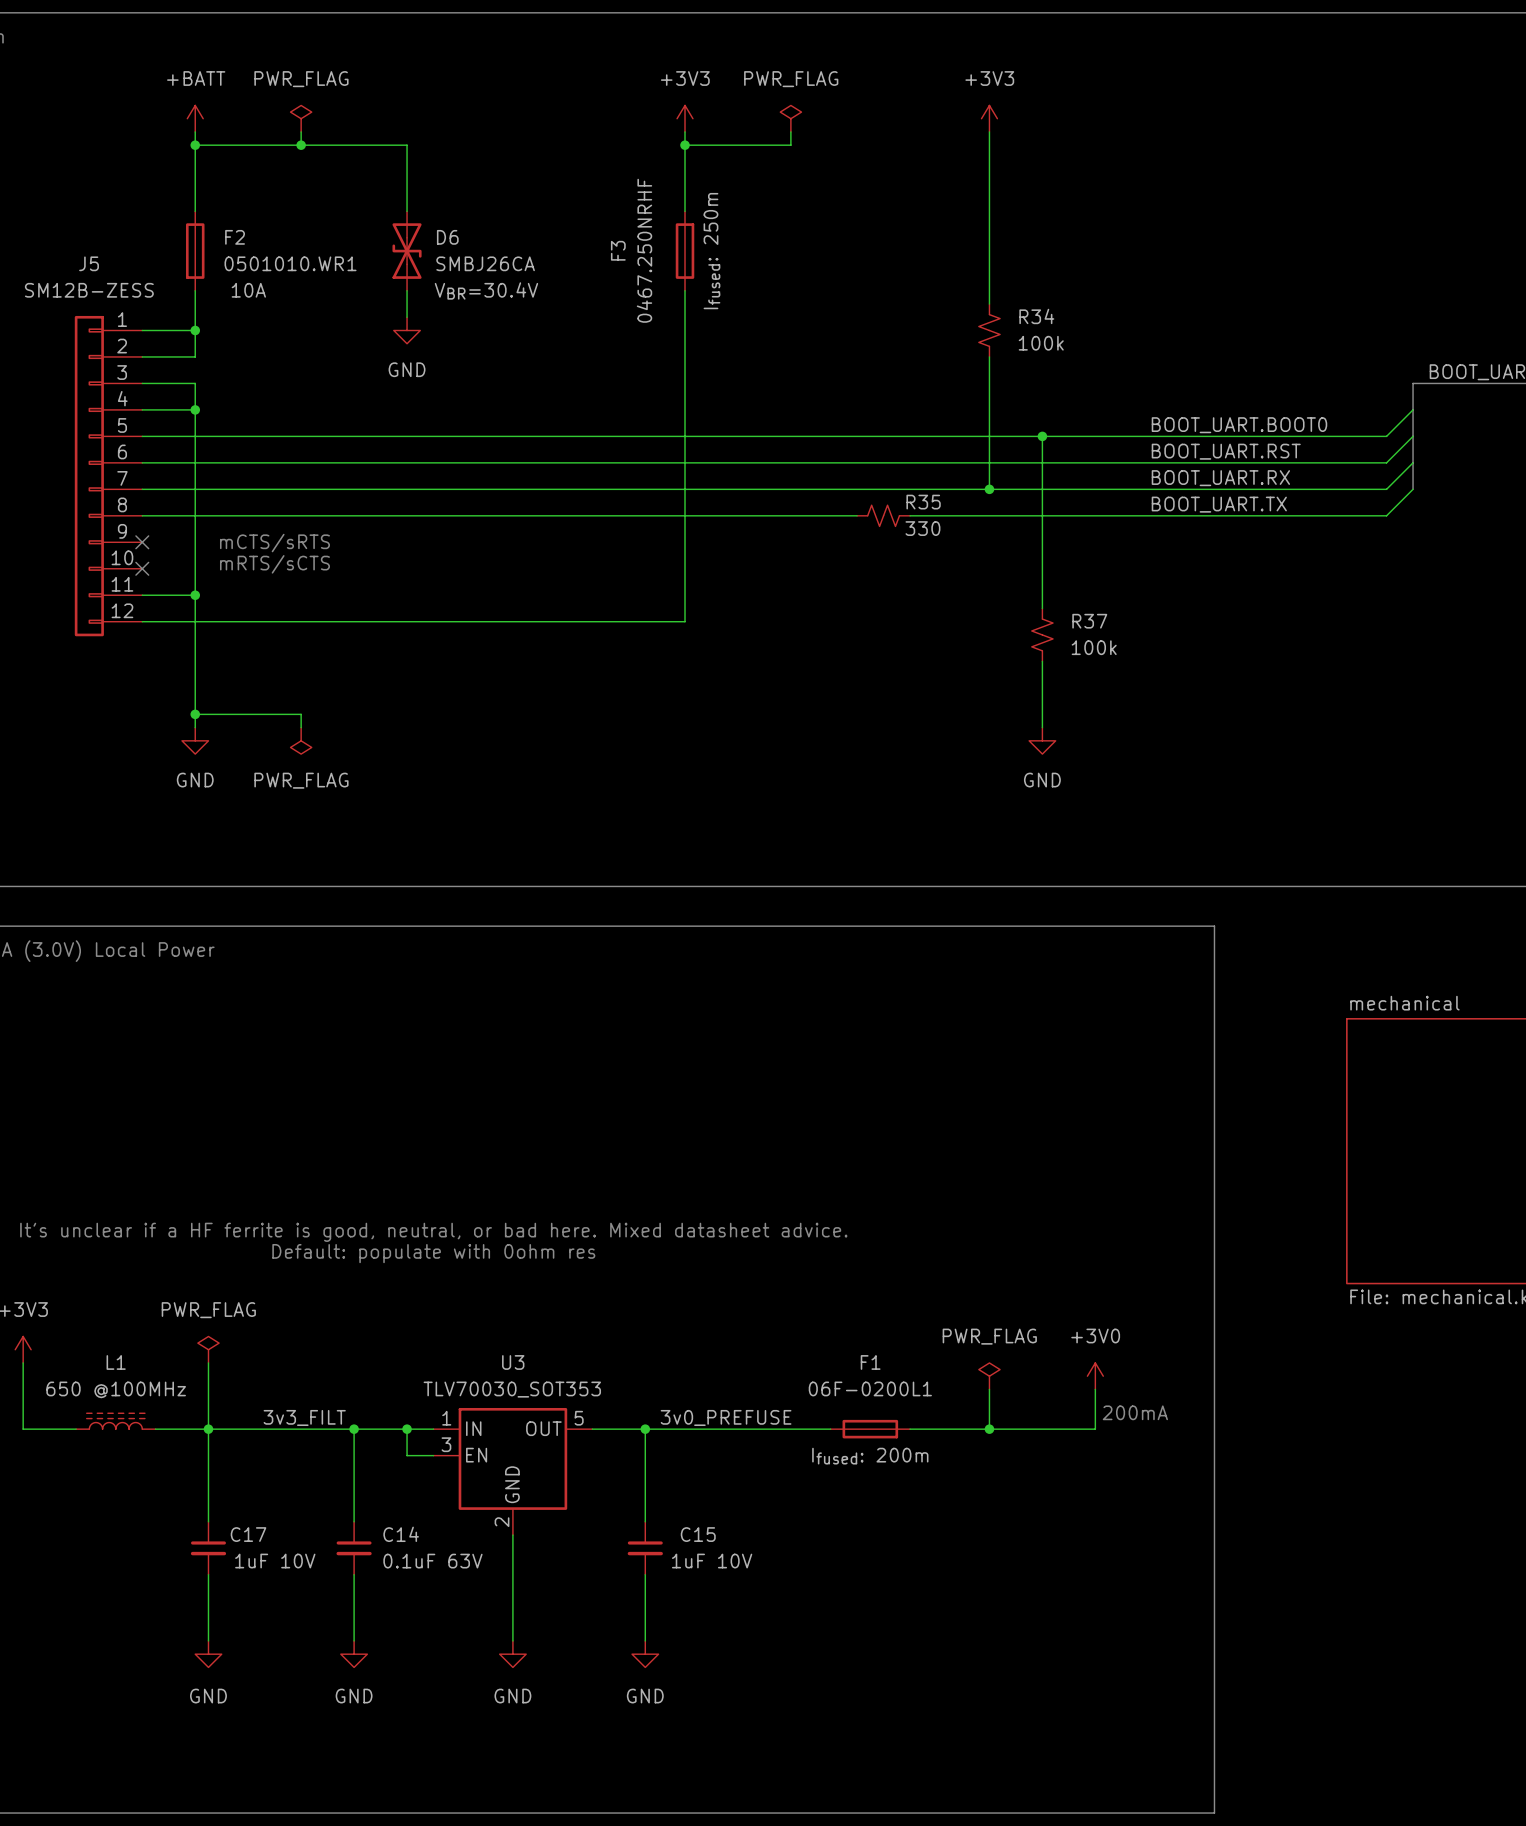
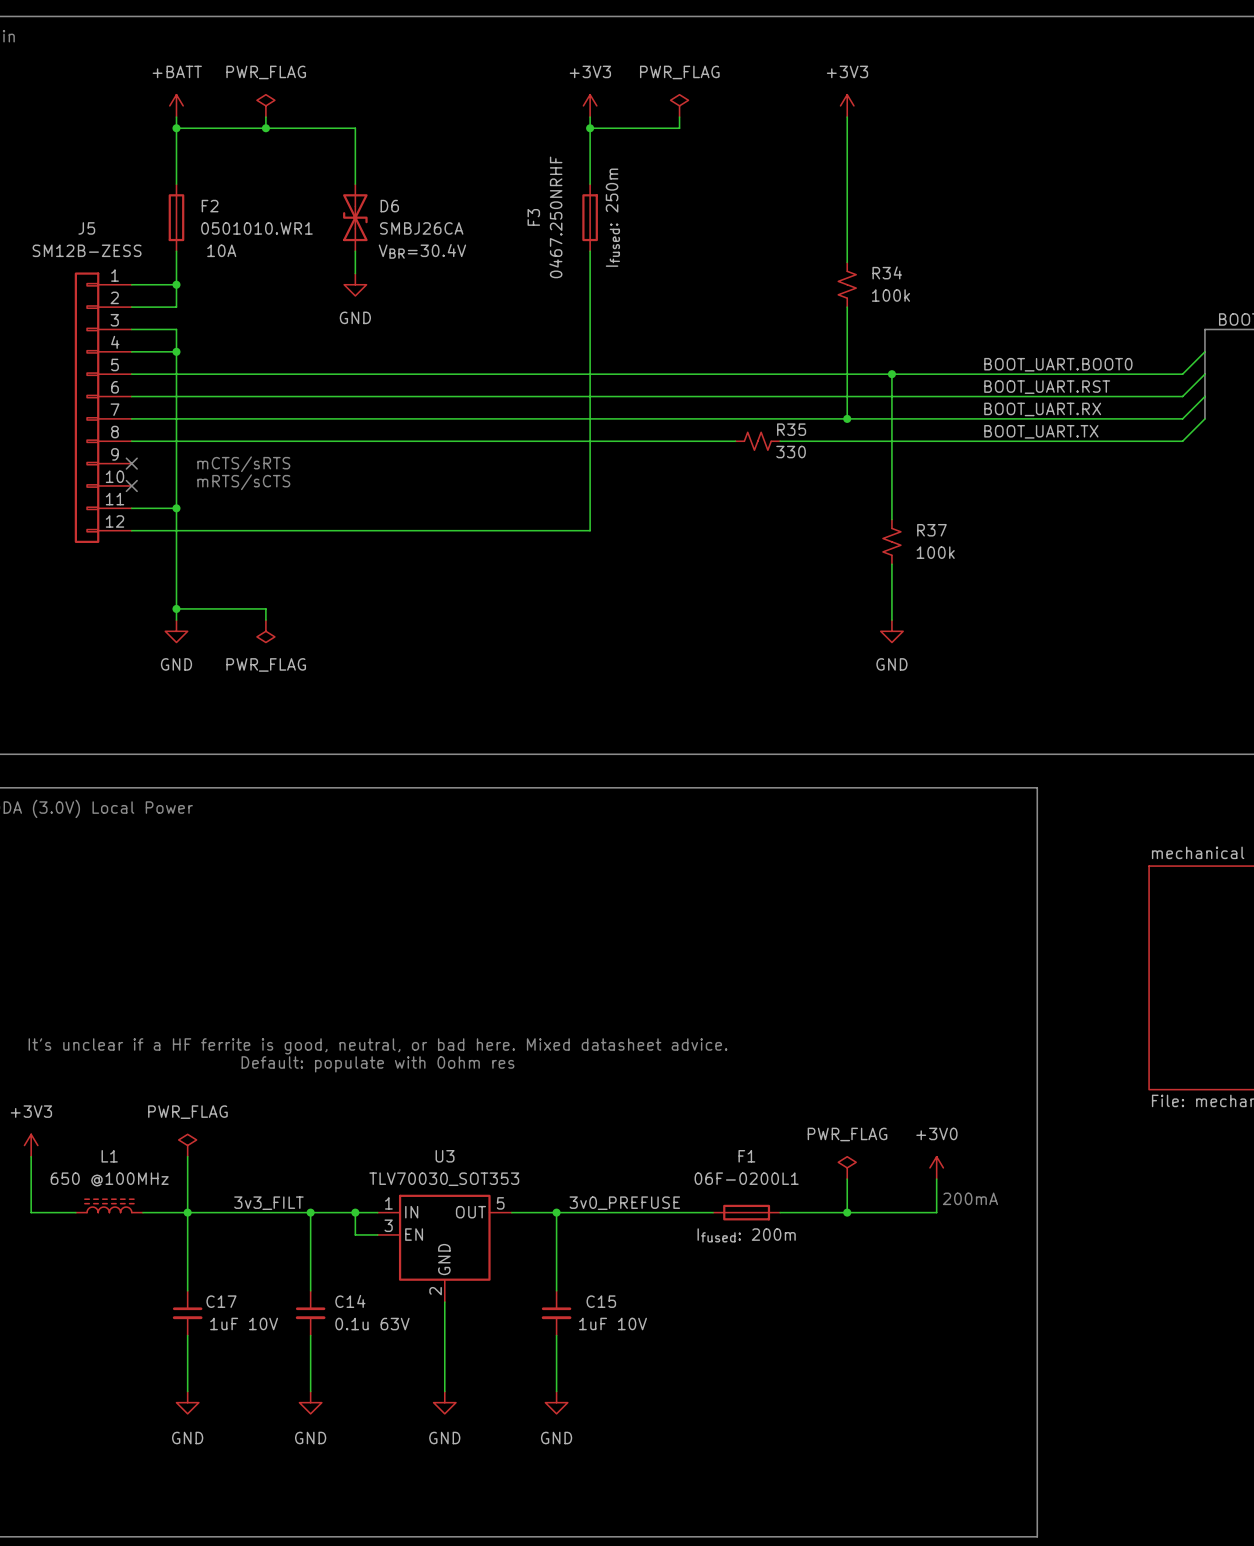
C14 value: 0.1uF 63V (432, 1561) -> 0.1u 63V (372, 1324)

